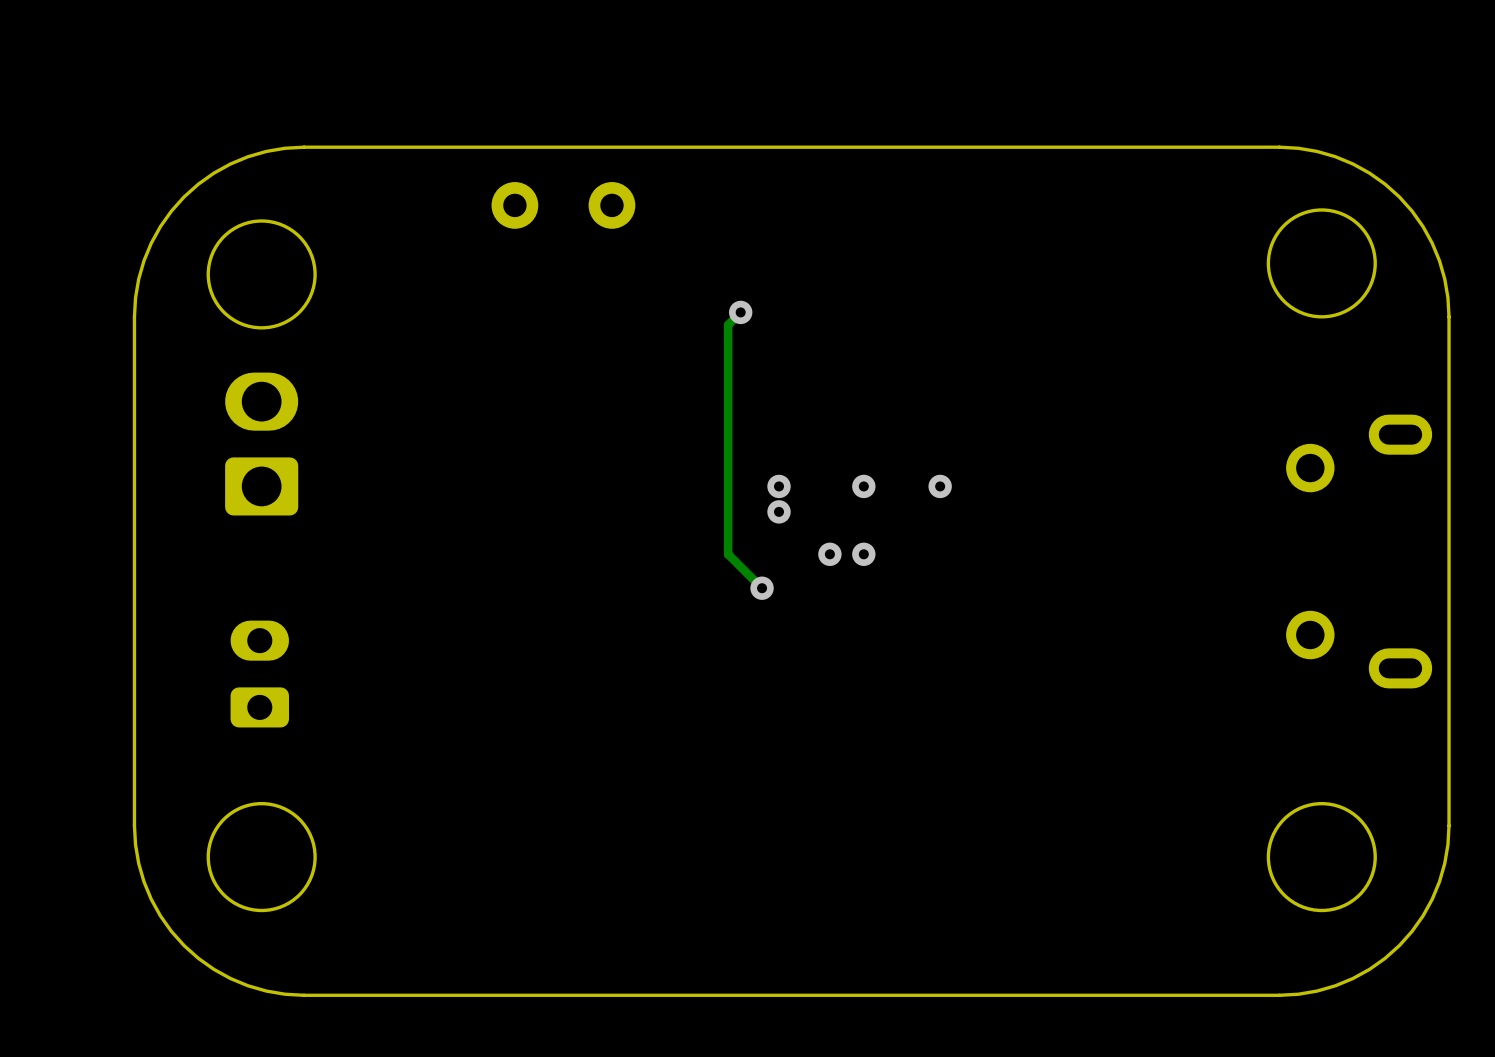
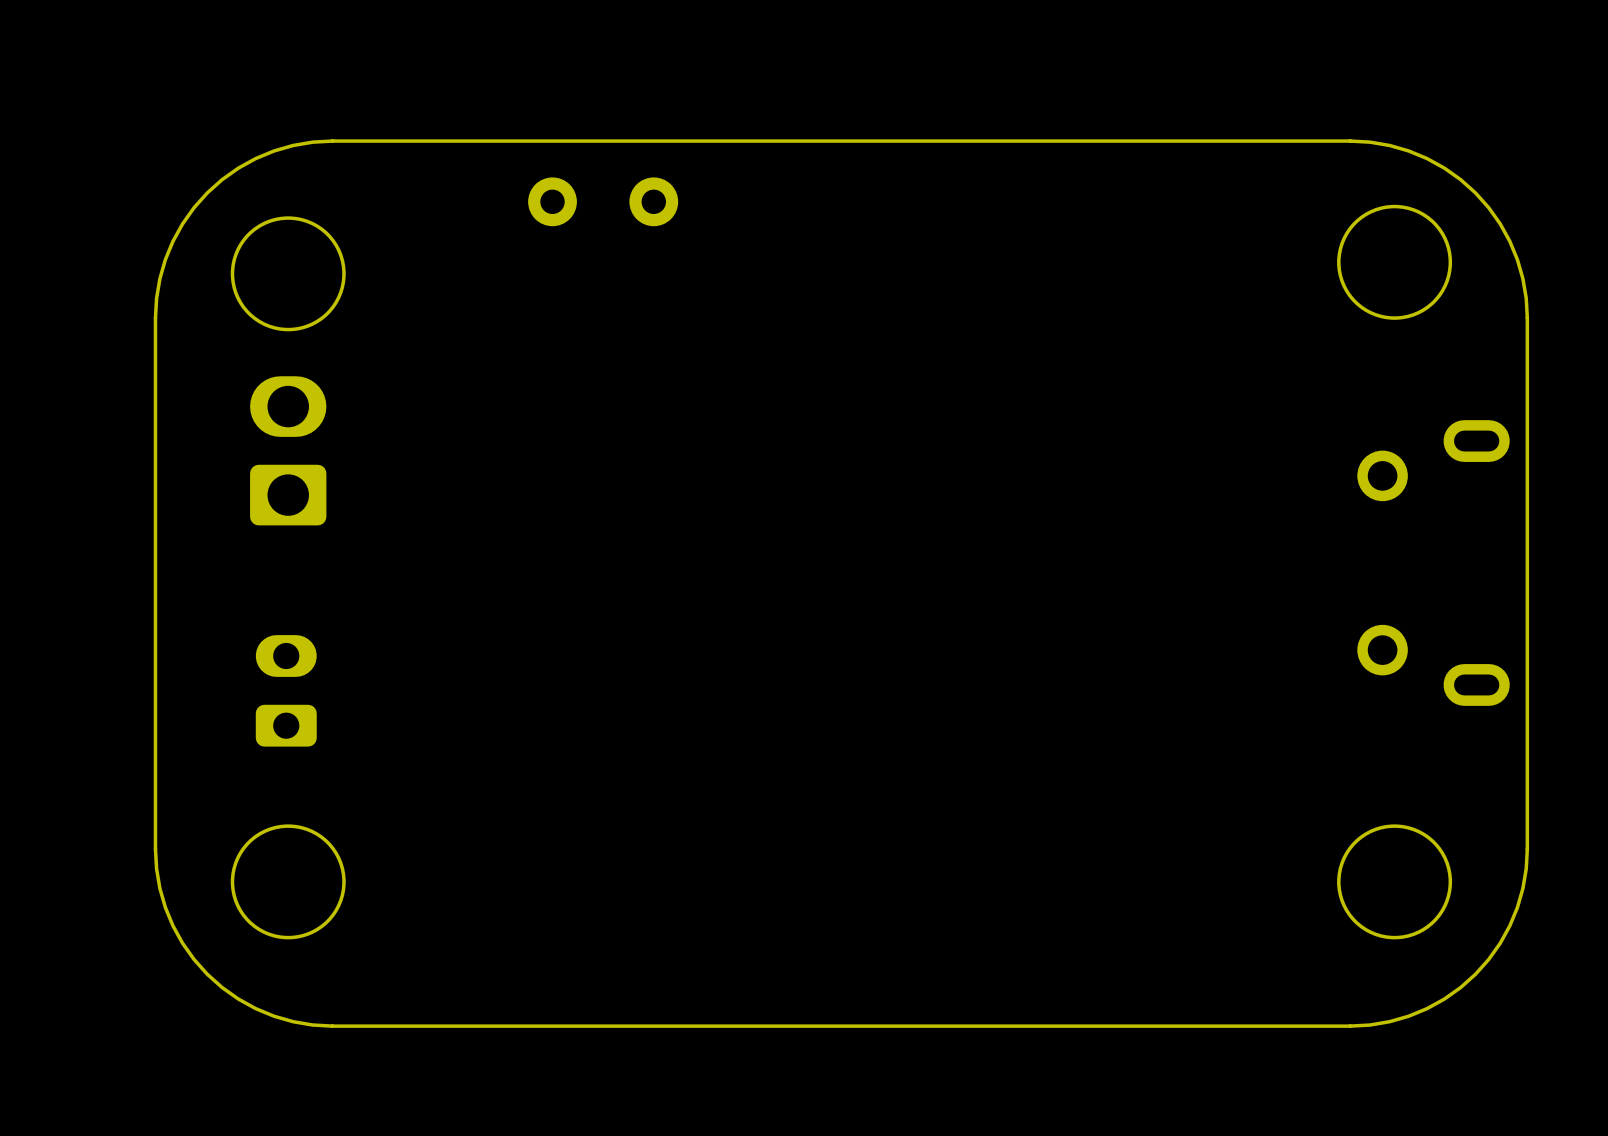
track: (740, 312) (728, 324) (728, 554) (762, 588) -> none
via: (740, 312) -> none
via: (779, 486) -> none
via: (863, 486) -> none
via: (940, 486) -> none
via: (779, 511) -> none
via: (829, 554) -> none
via: (863, 554) -> none
via: (762, 588) -> none

